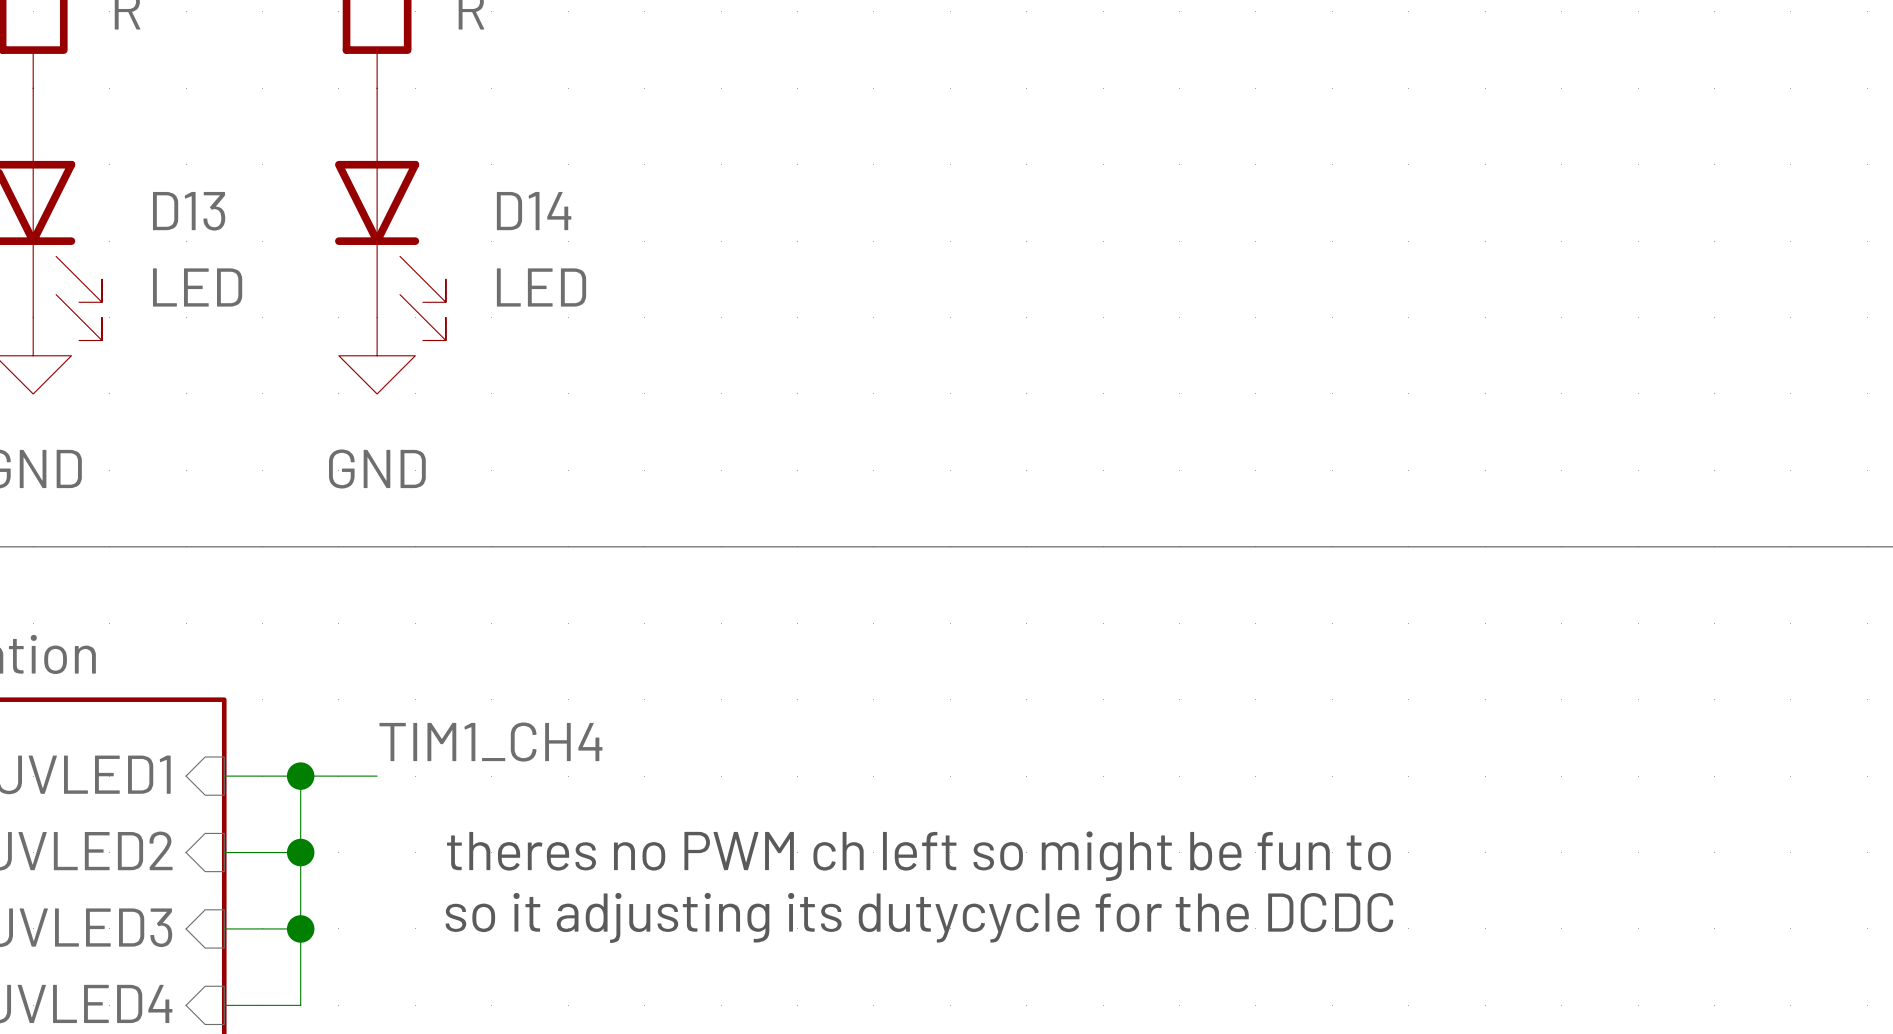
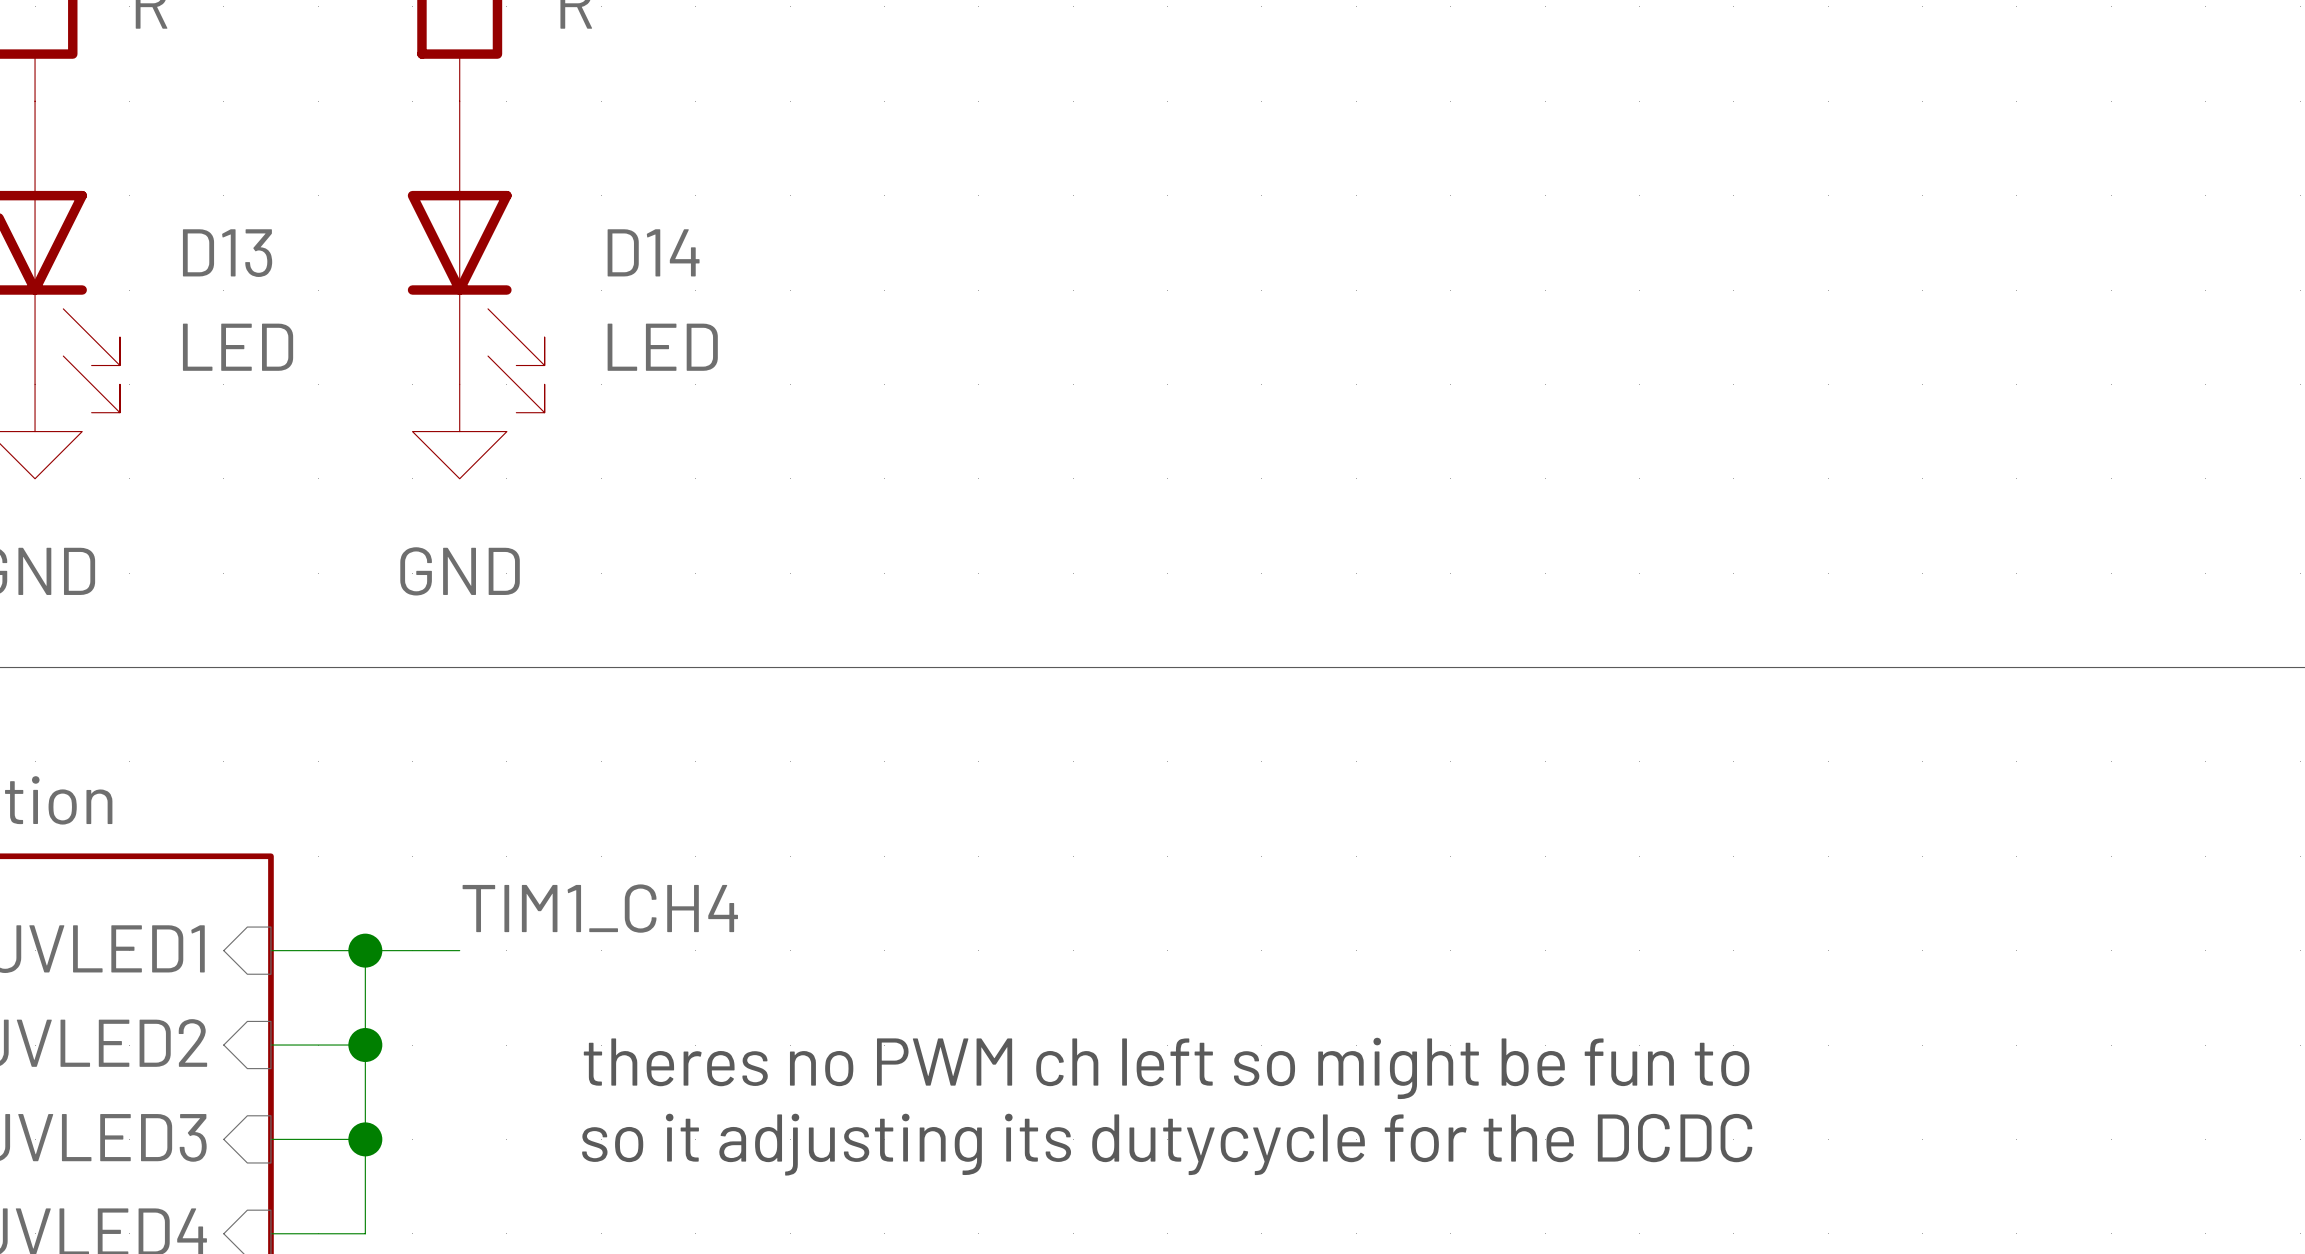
text position: theres no PWM ch left so might be fun to (918, 856) -> theres no PWM ch left so might be fun to (1166, 1068)
text position: so it adjusting its dutycycle for the DCDC (919, 917) -> so it adjusting its dutycycle for the DCDC (1167, 1144)

